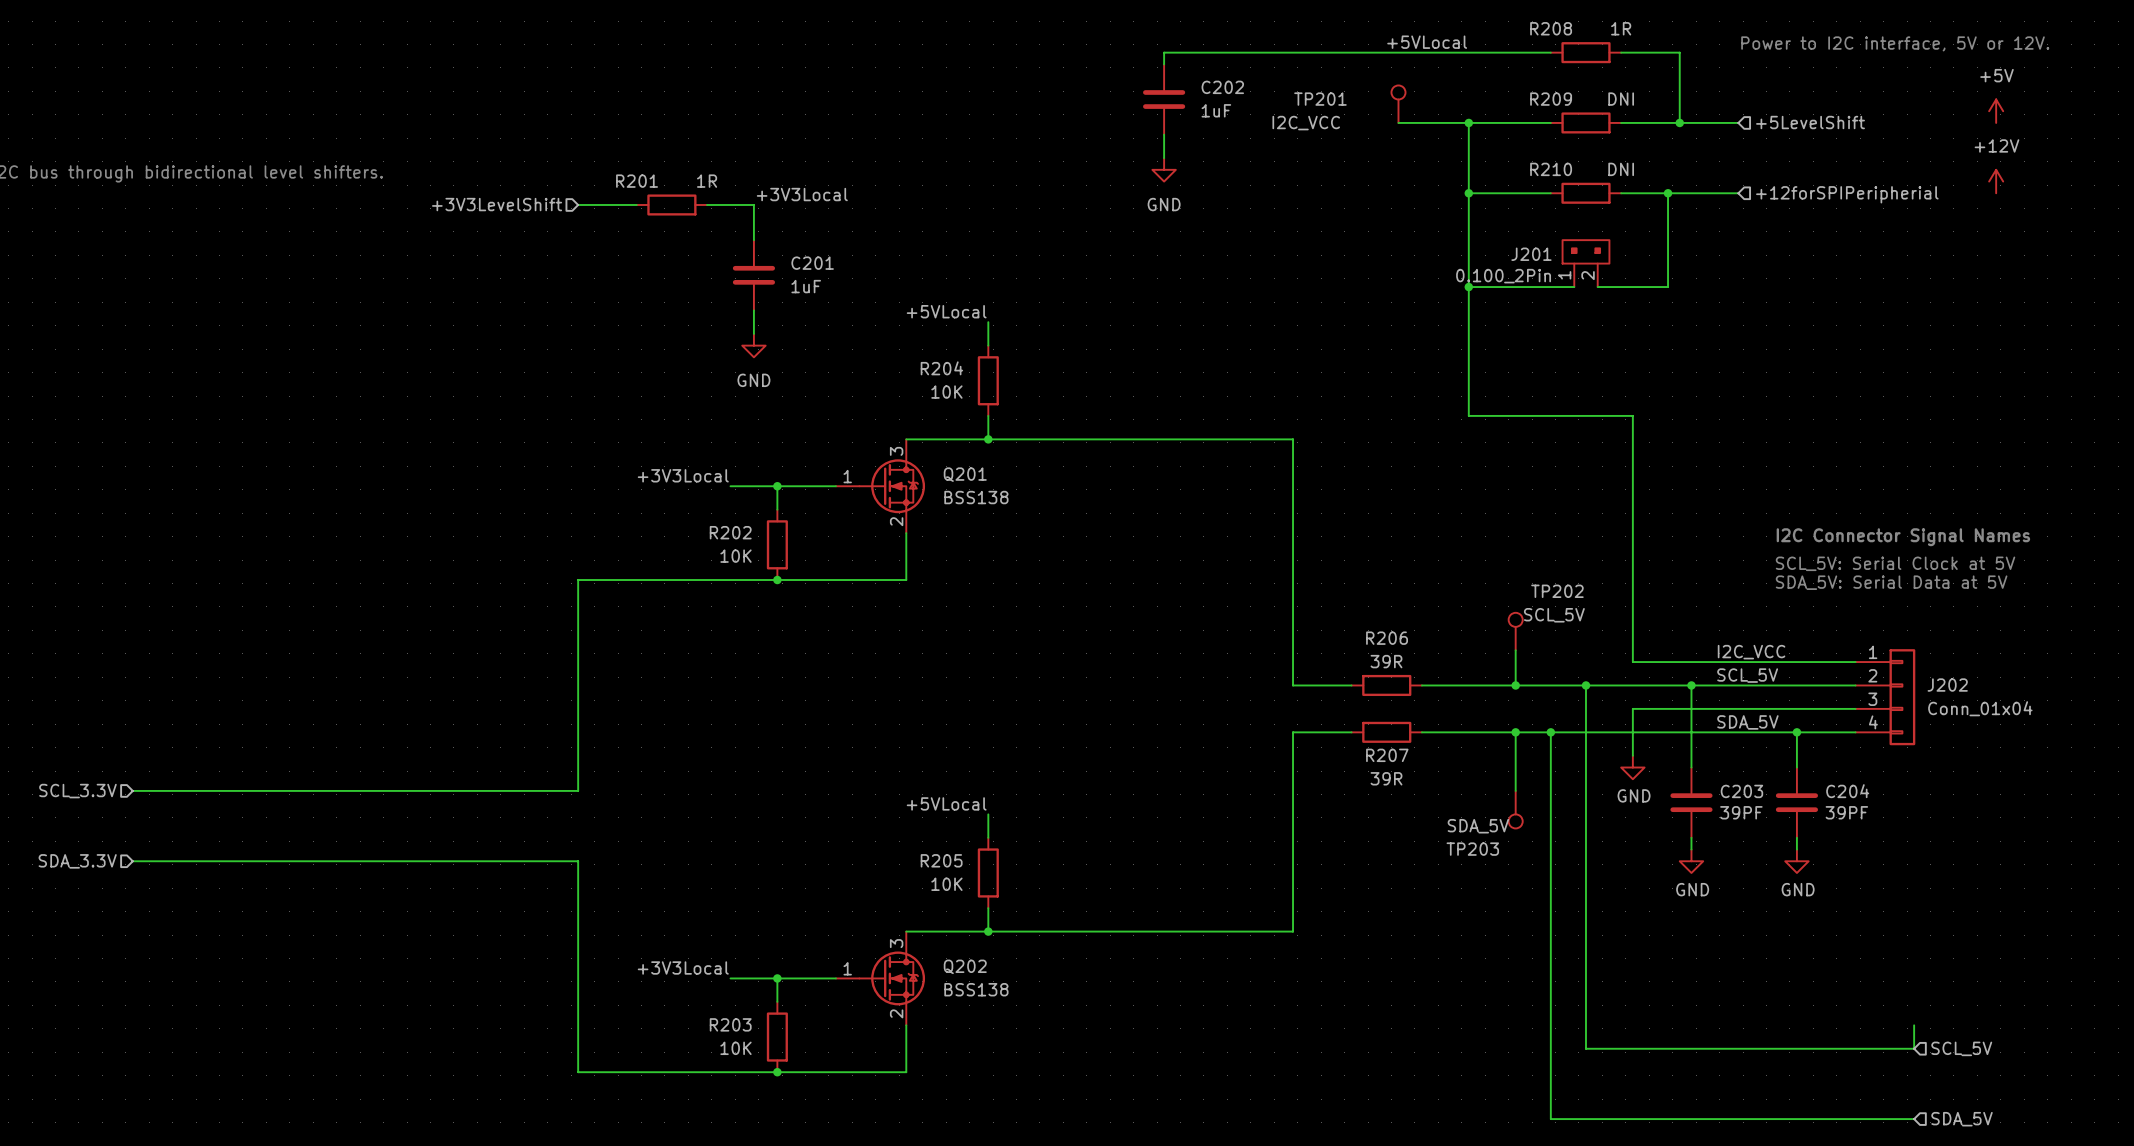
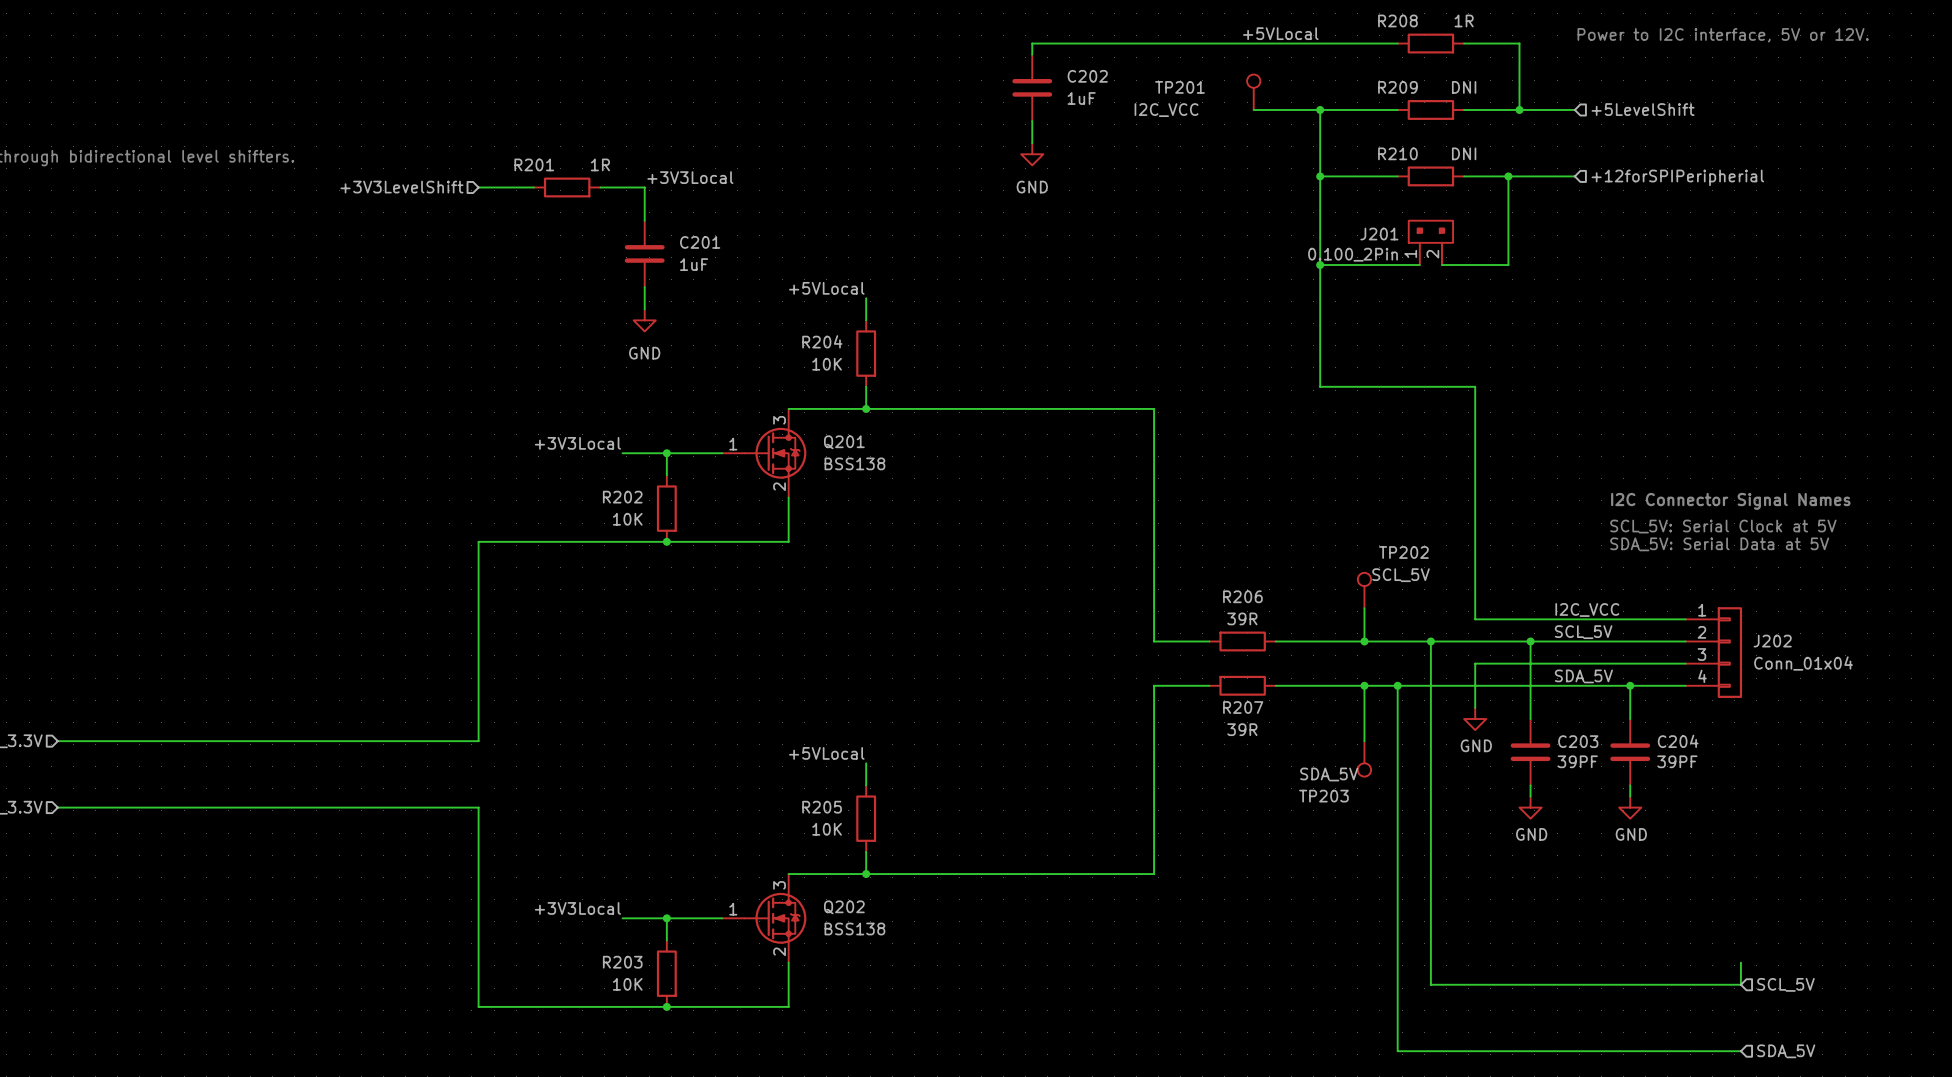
power symbol: +5V (1996, 111) -> none
power symbol: +12V (1996, 181) -> none

